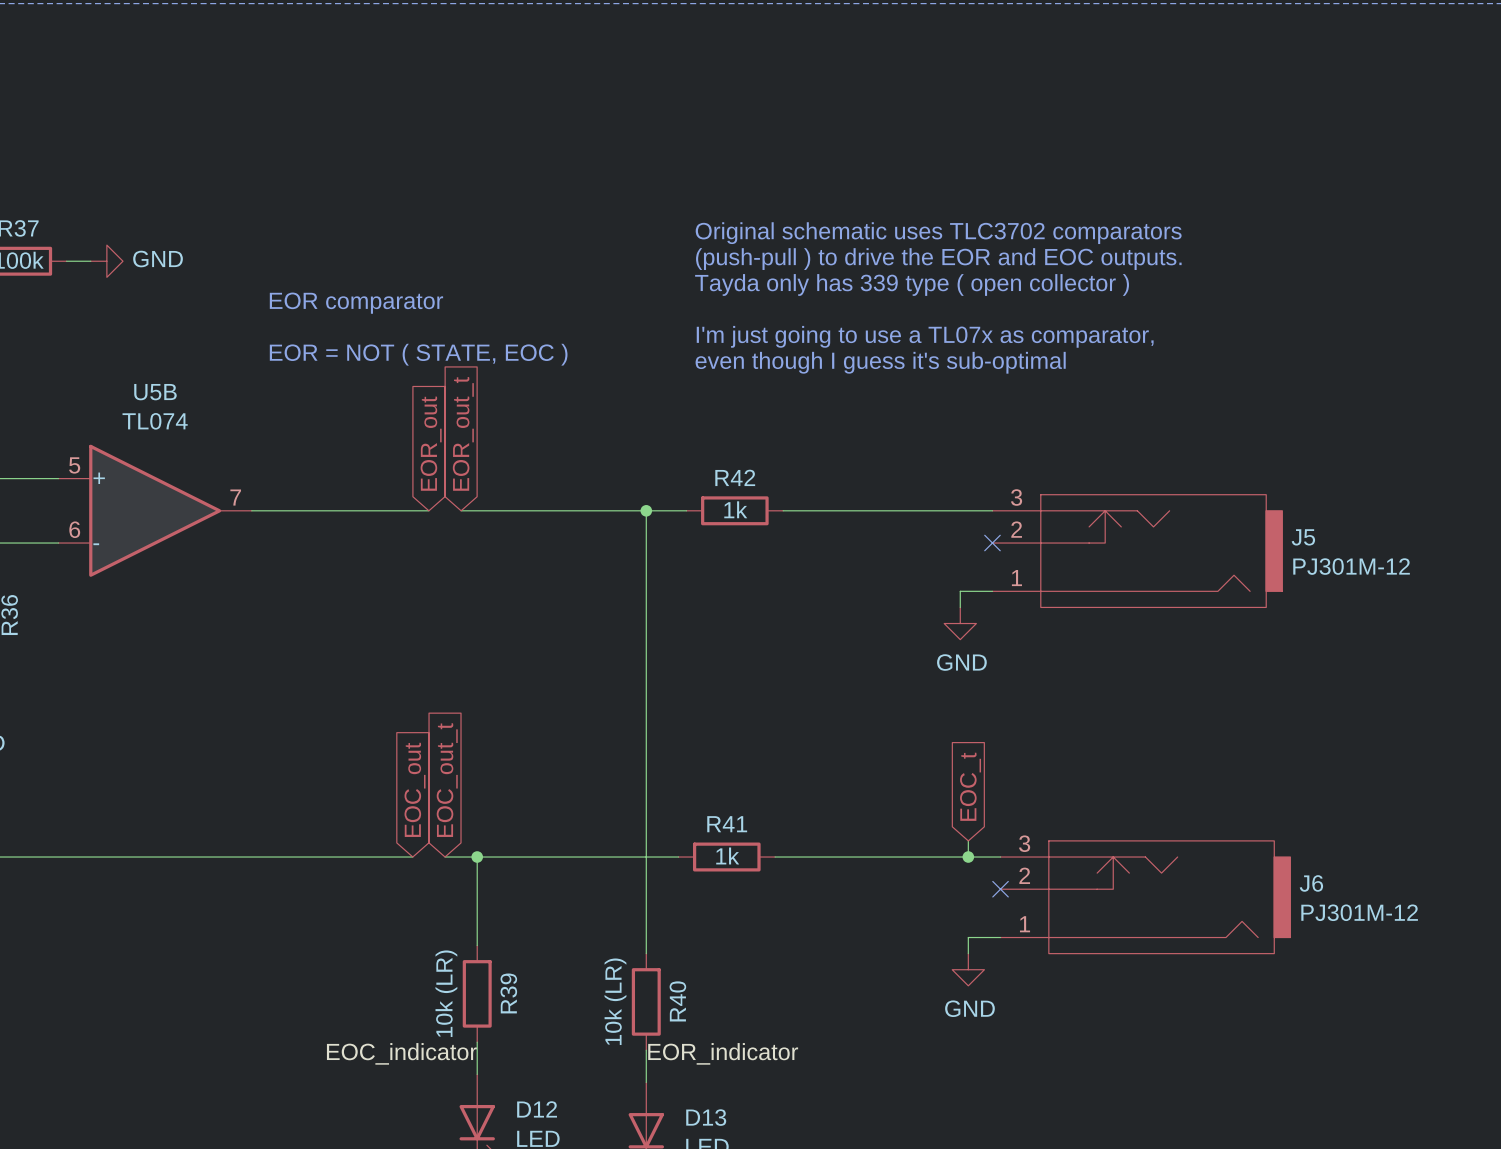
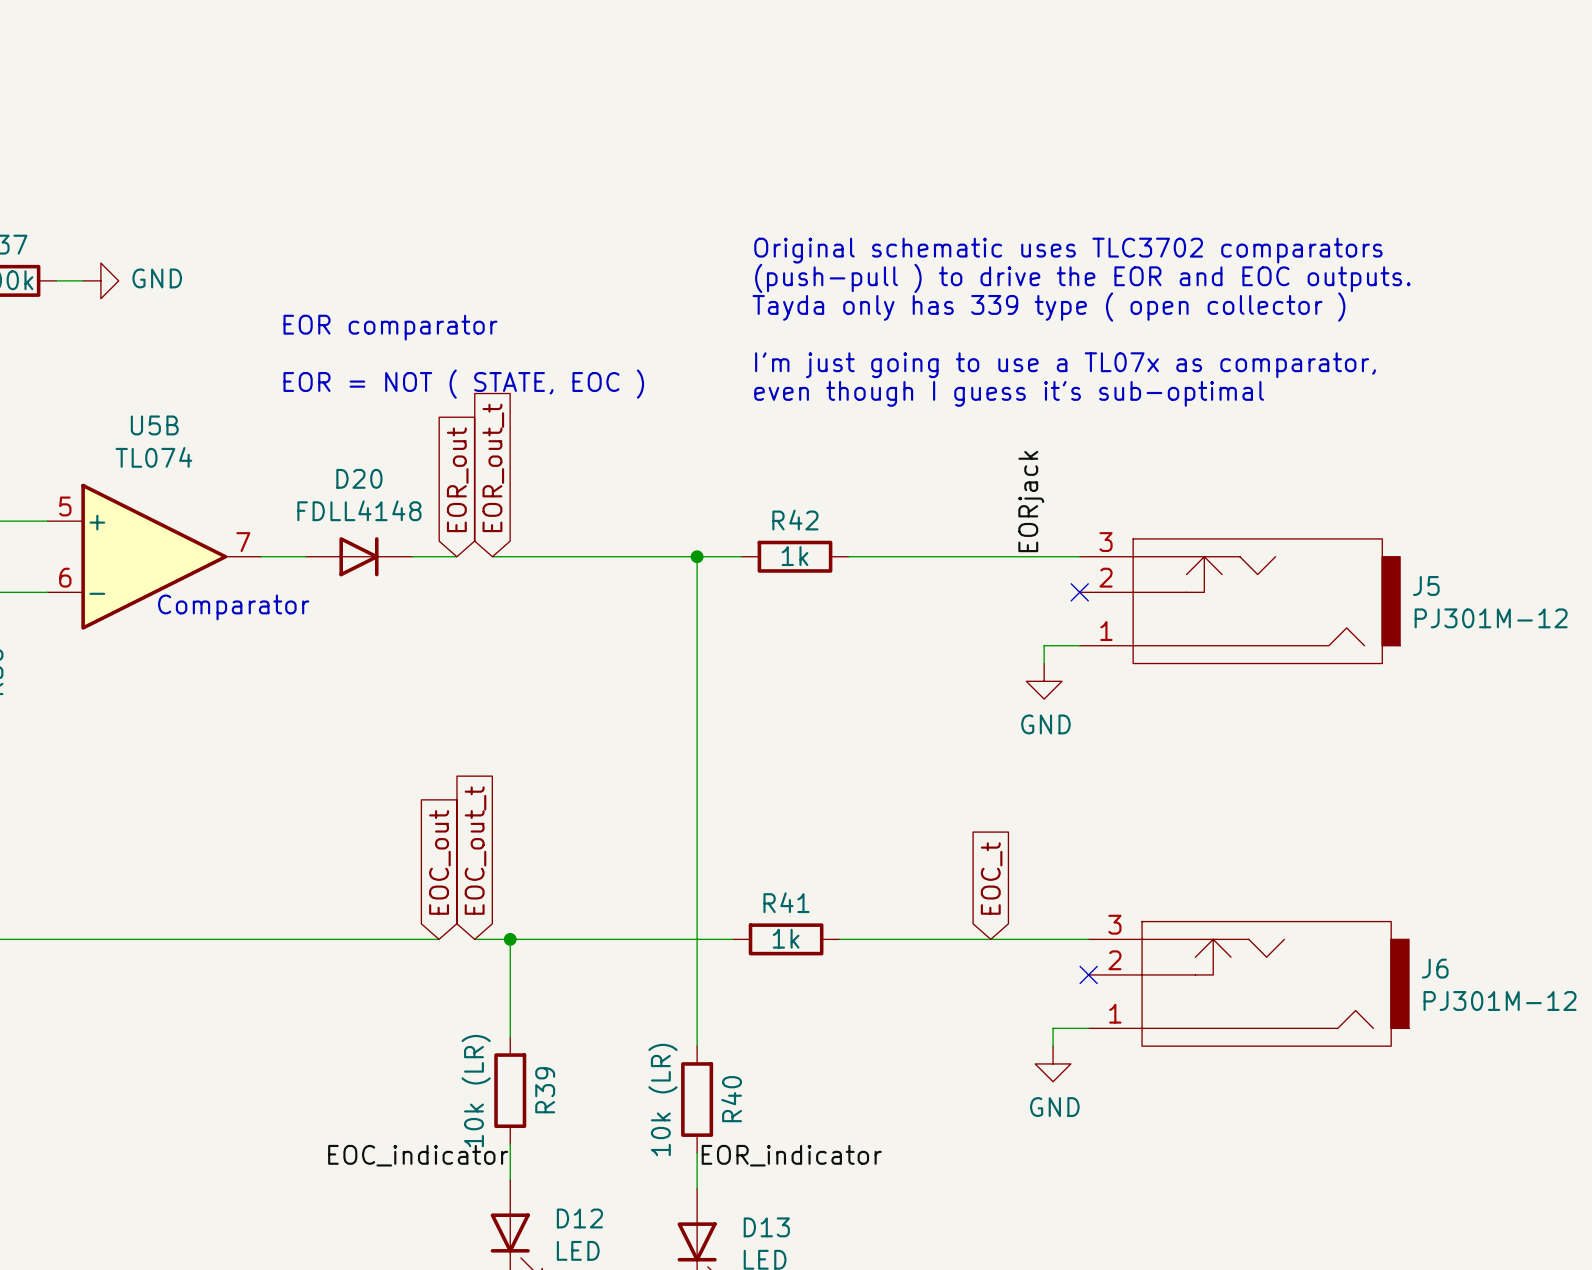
label: none -> EORjack (1031, 501)
D20: none -> FDLL4148 (358, 556)
text: none -> Comparator (233, 607)
global label position: EOC_t (970, 786) -> EOC_t (991, 878)
wire: (968, 840) (968, 857) -> none
junction: (968, 857) -> none

